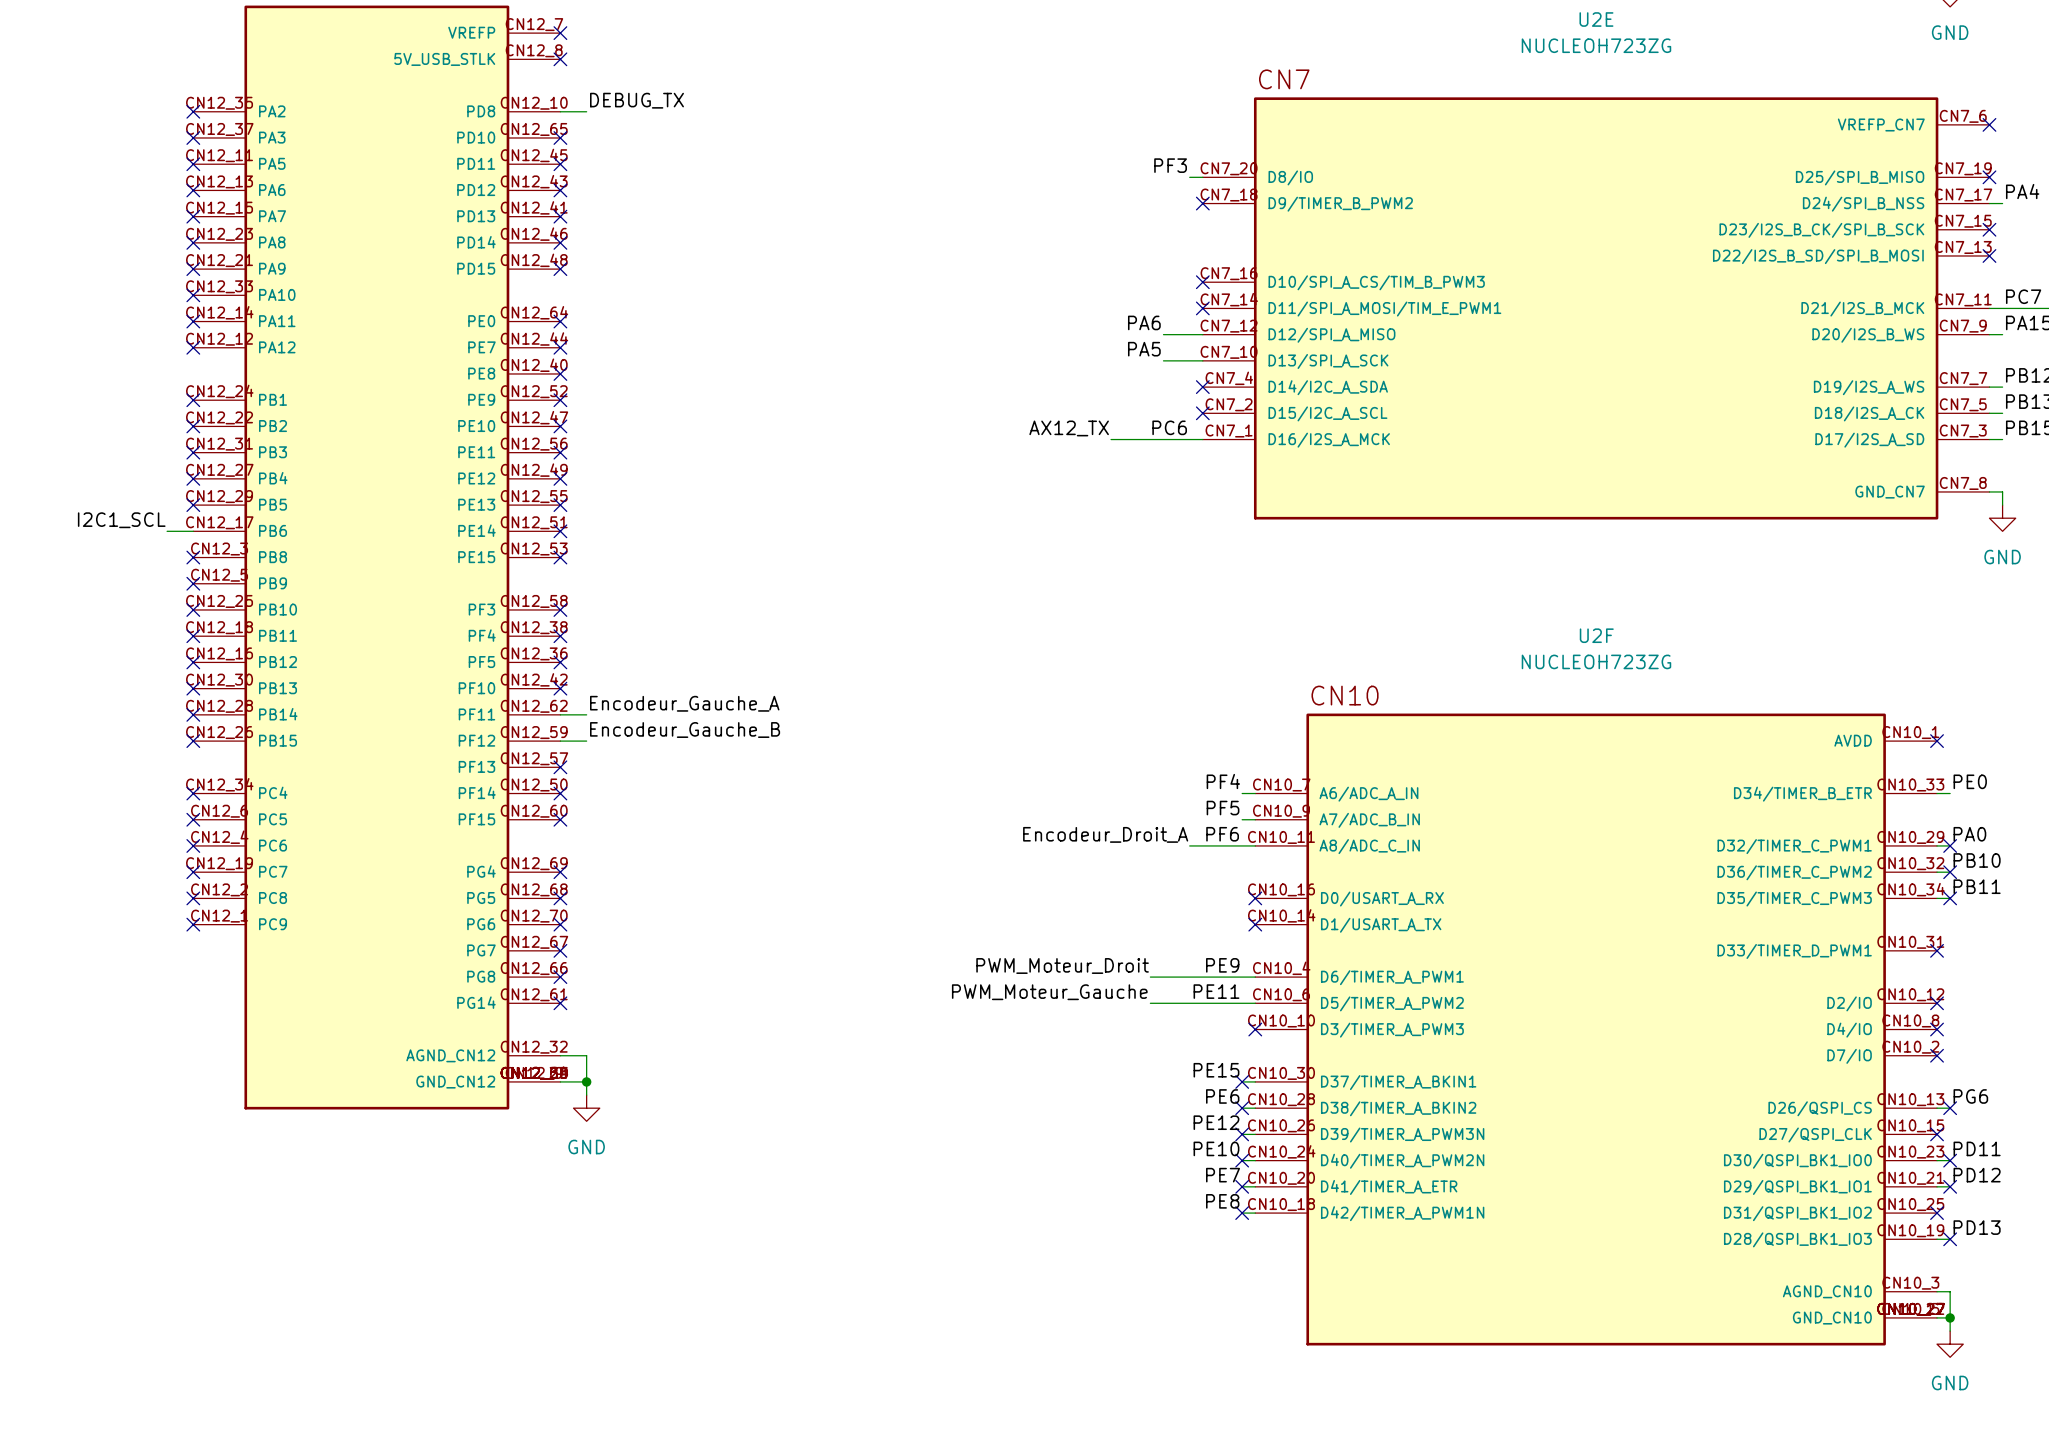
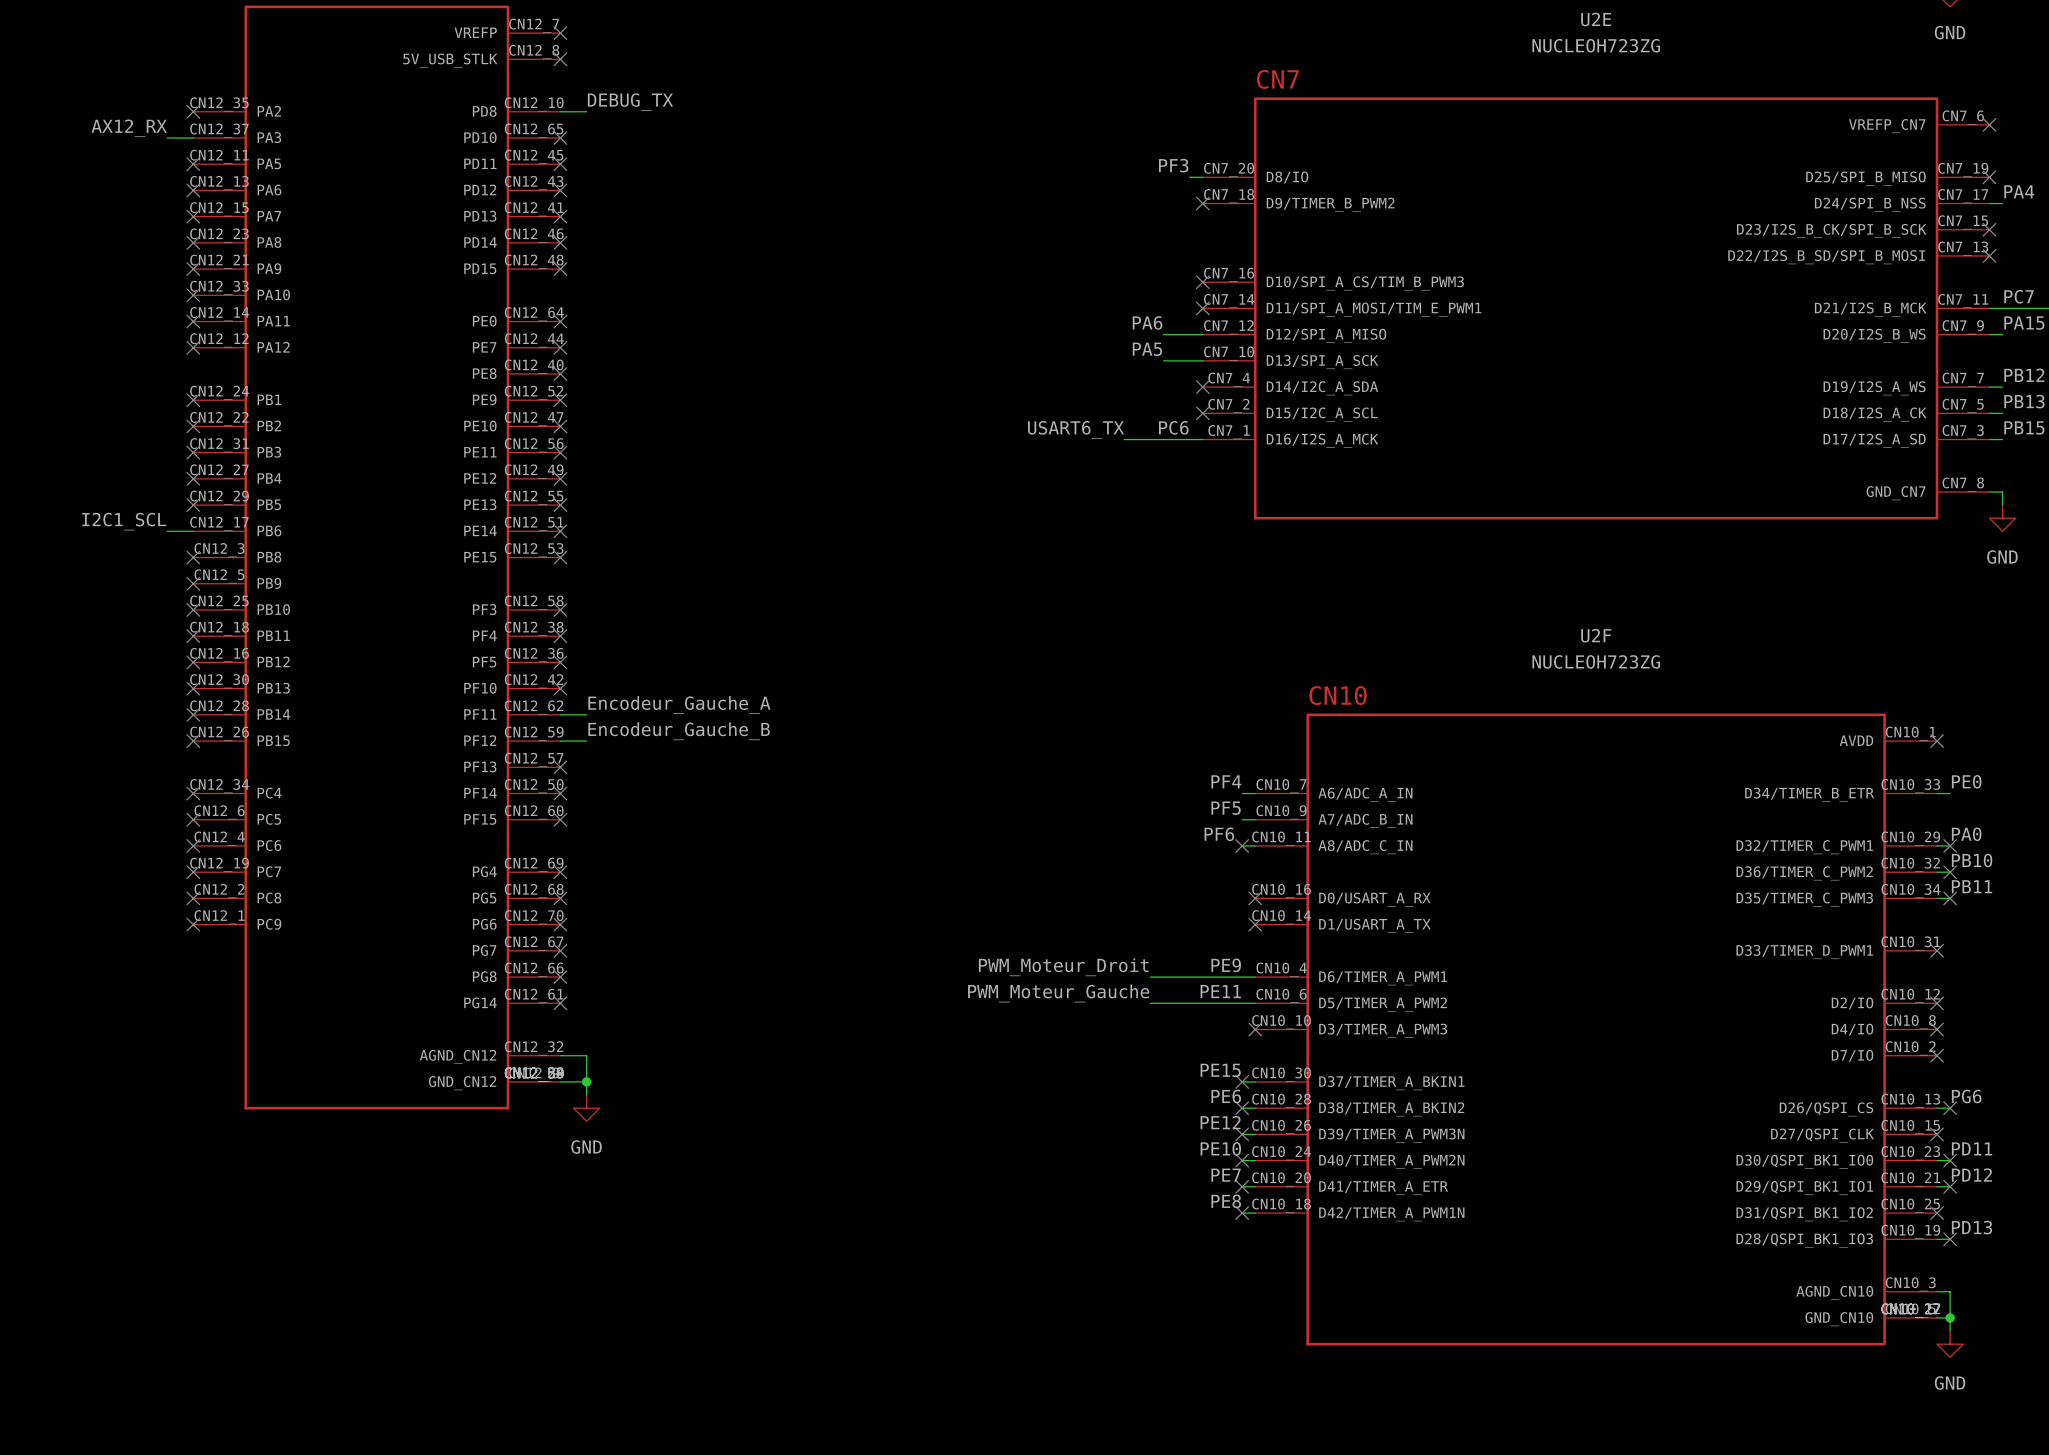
label: none -> AX12_RX (129, 128)
wire: none -> (167, 137) (193, 137)
no-connect mark: (193, 137) -> none
label: AX12_TX (1069, 428) -> none
label: none -> USART6_TX (1076, 429)
wire: (1111, 439) (1124, 439) -> none
label: Encodeur_Droit_A (1105, 834) -> none
wire: (1189, 845) (1242, 845) -> none
no-connect mark: none -> (1242, 845)

